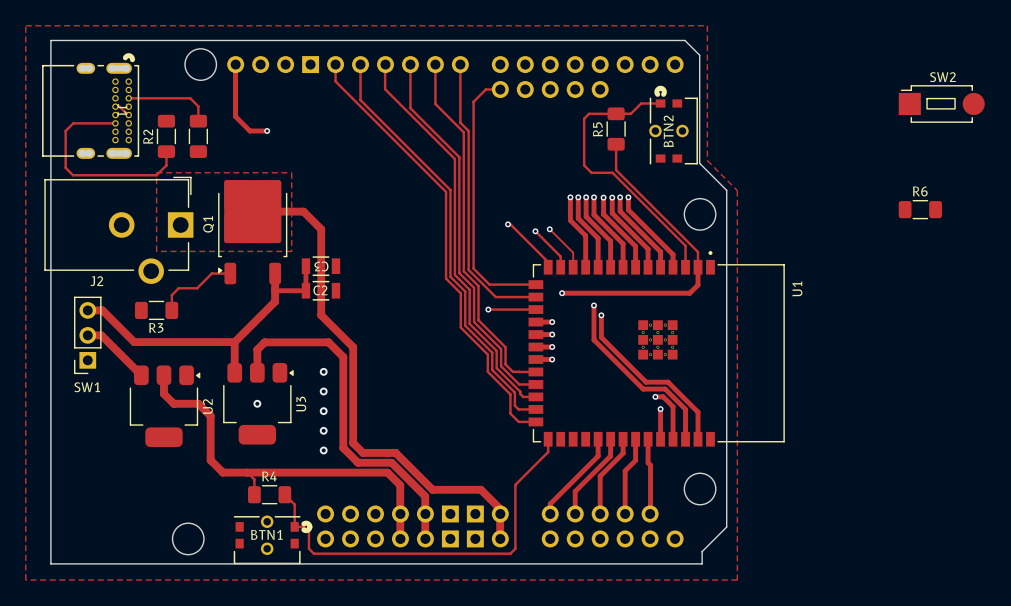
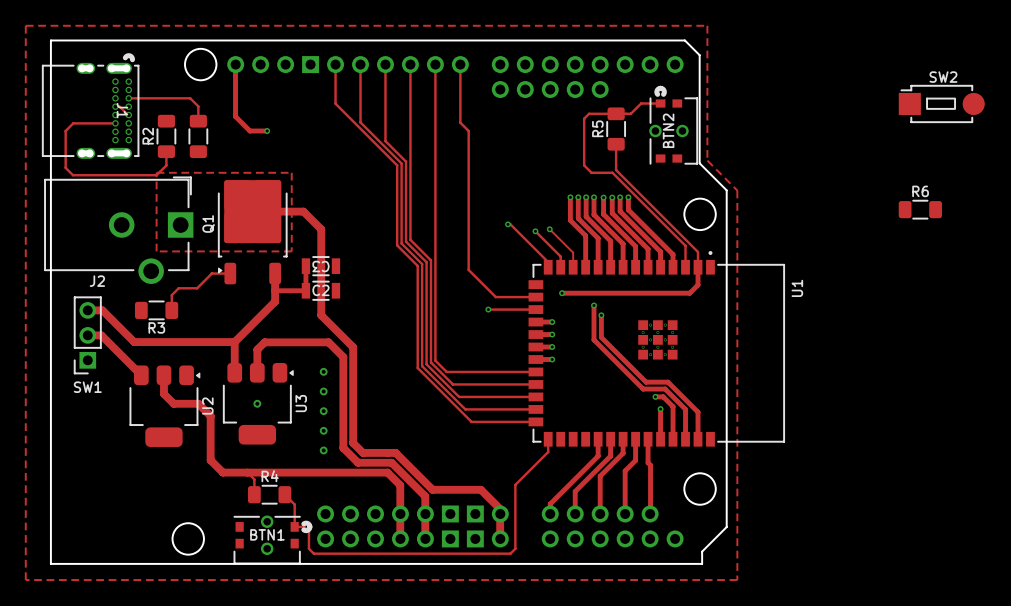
track: (385, 64) (385, 89) (454, 159) (454, 274) (469, 289) (469, 323) (496, 350) (496, 368) (523, 396) -> (385, 64) (385, 141) (406, 161) (406, 241) (426, 262) (426, 364) (459, 396) (523, 396)
track: (335, 81) (446, 191) (446, 278) (460, 293) (460, 327) (487, 354) (487, 371) (510, 394) (510, 413) (518, 421) -> (335, 81) (335, 103) (397, 165) (397, 245) (417, 265) (417, 368) (471, 421) (518, 421)
track: (500, 89) (485, 89) (473, 101) (473, 268) (489, 284) (535, 284) -> none
track: (360, 100) (450, 190) (450, 276) (465, 291) (465, 325) (492, 352) (492, 369) (514, 392) (514, 405) (518, 409) -> (360, 100) (360, 122) (401, 163) (401, 243) (422, 264) (422, 366) (465, 409) (518, 409)
track: (435, 104) (463, 132) (463, 271) (478, 286) (478, 320) (505, 347) (505, 364) (512, 371) (519, 371) -> (435, 104) (435, 360) (446, 371) (519, 371)
track: (410, 108) (459, 157) (459, 273) (474, 287) (474, 322) (501, 349) (501, 366) (519, 384) -> (410, 108) (410, 239) (430, 260) (430, 362) (452, 384) (519, 384)

